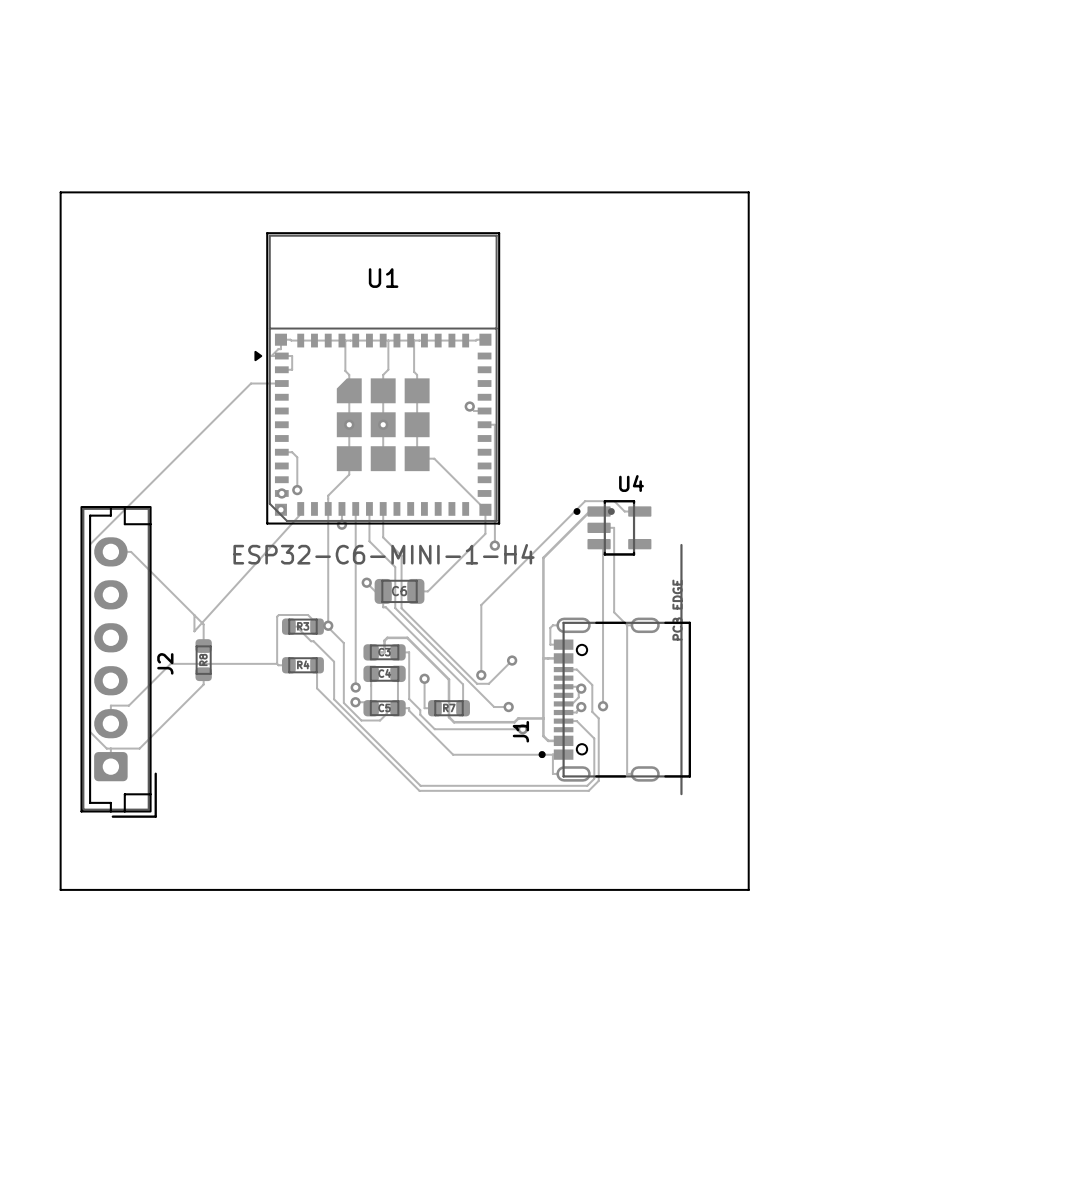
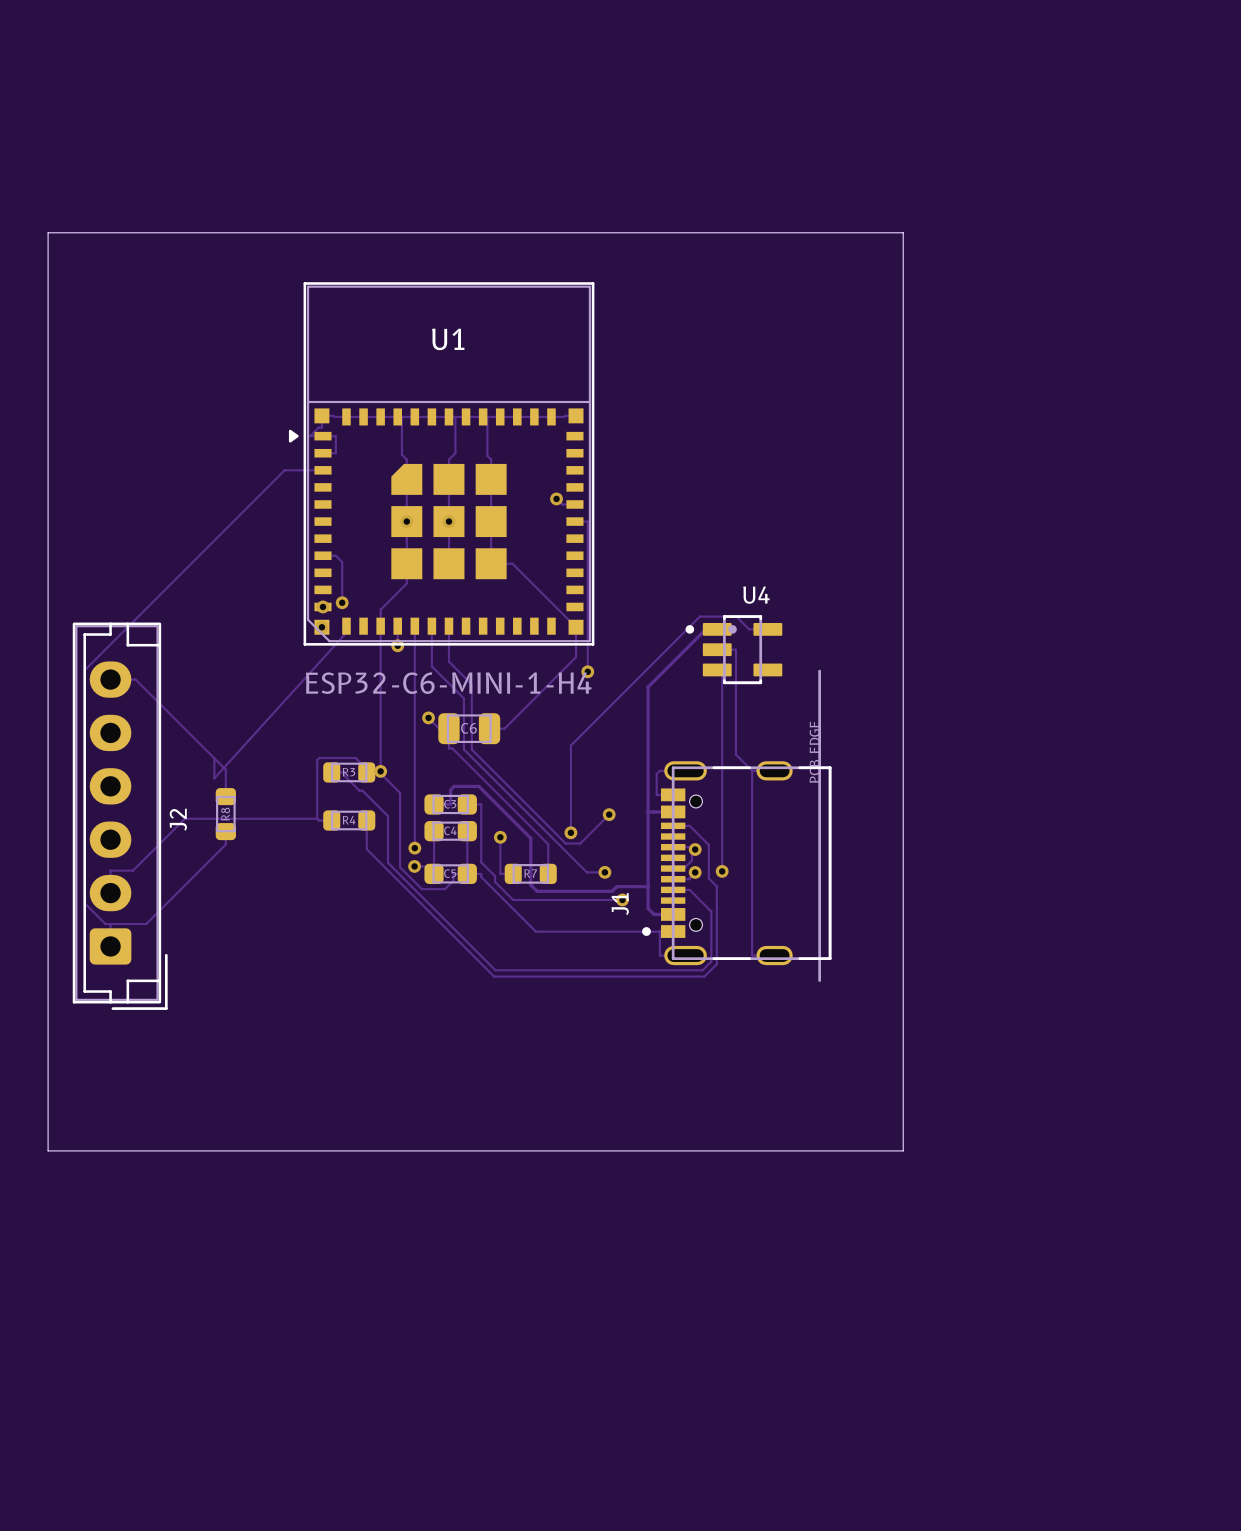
board edge: (60, 889) (748, 889) -> (48, 1099) (48, 1150) (903, 1150) (903, 1099)

